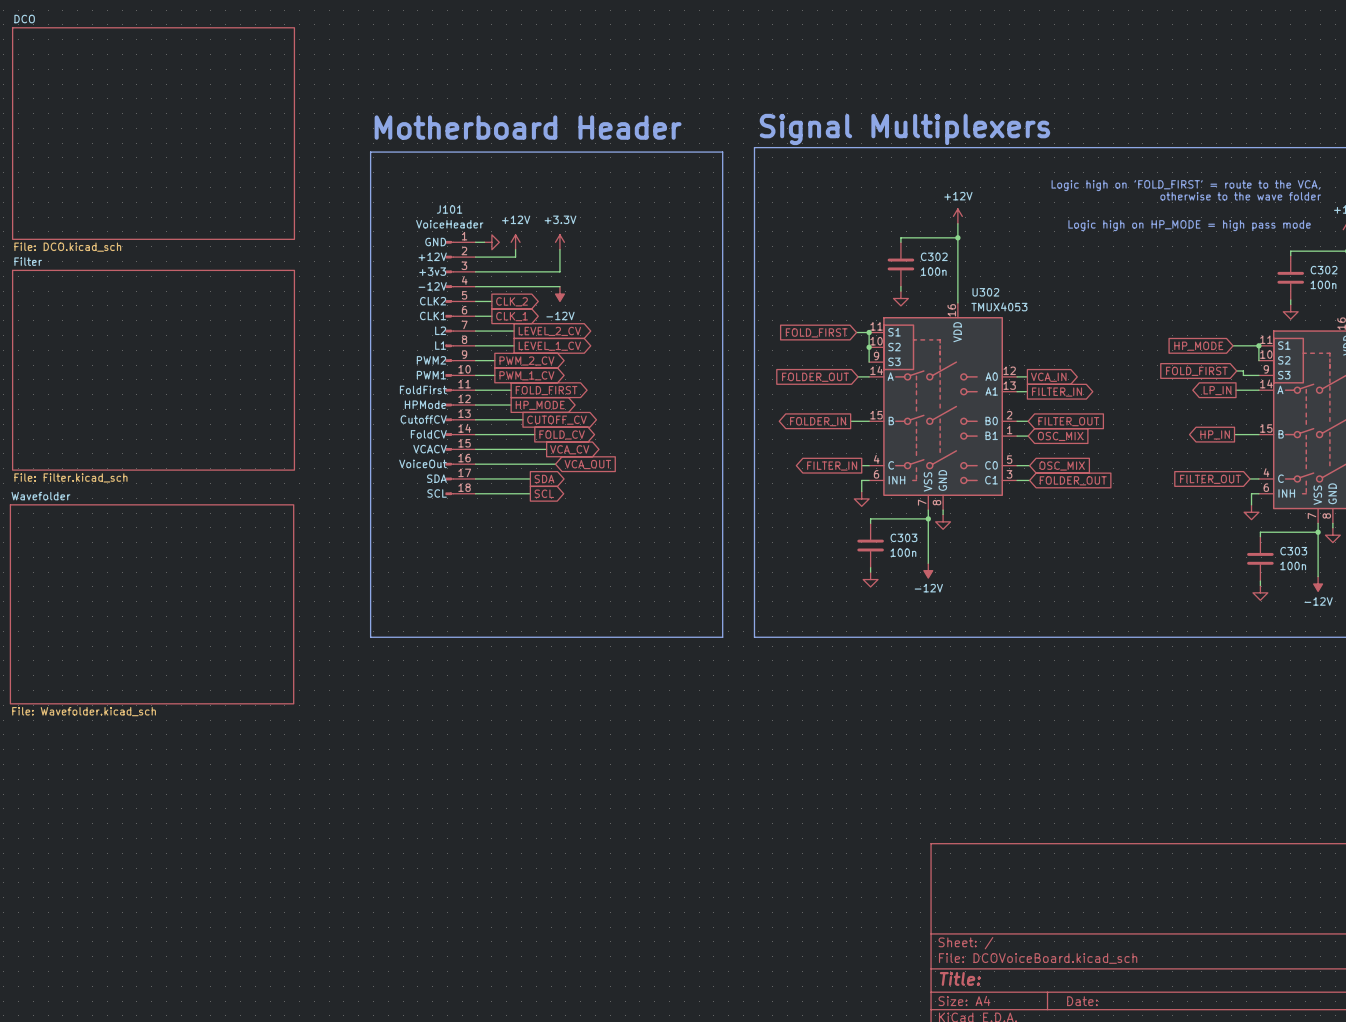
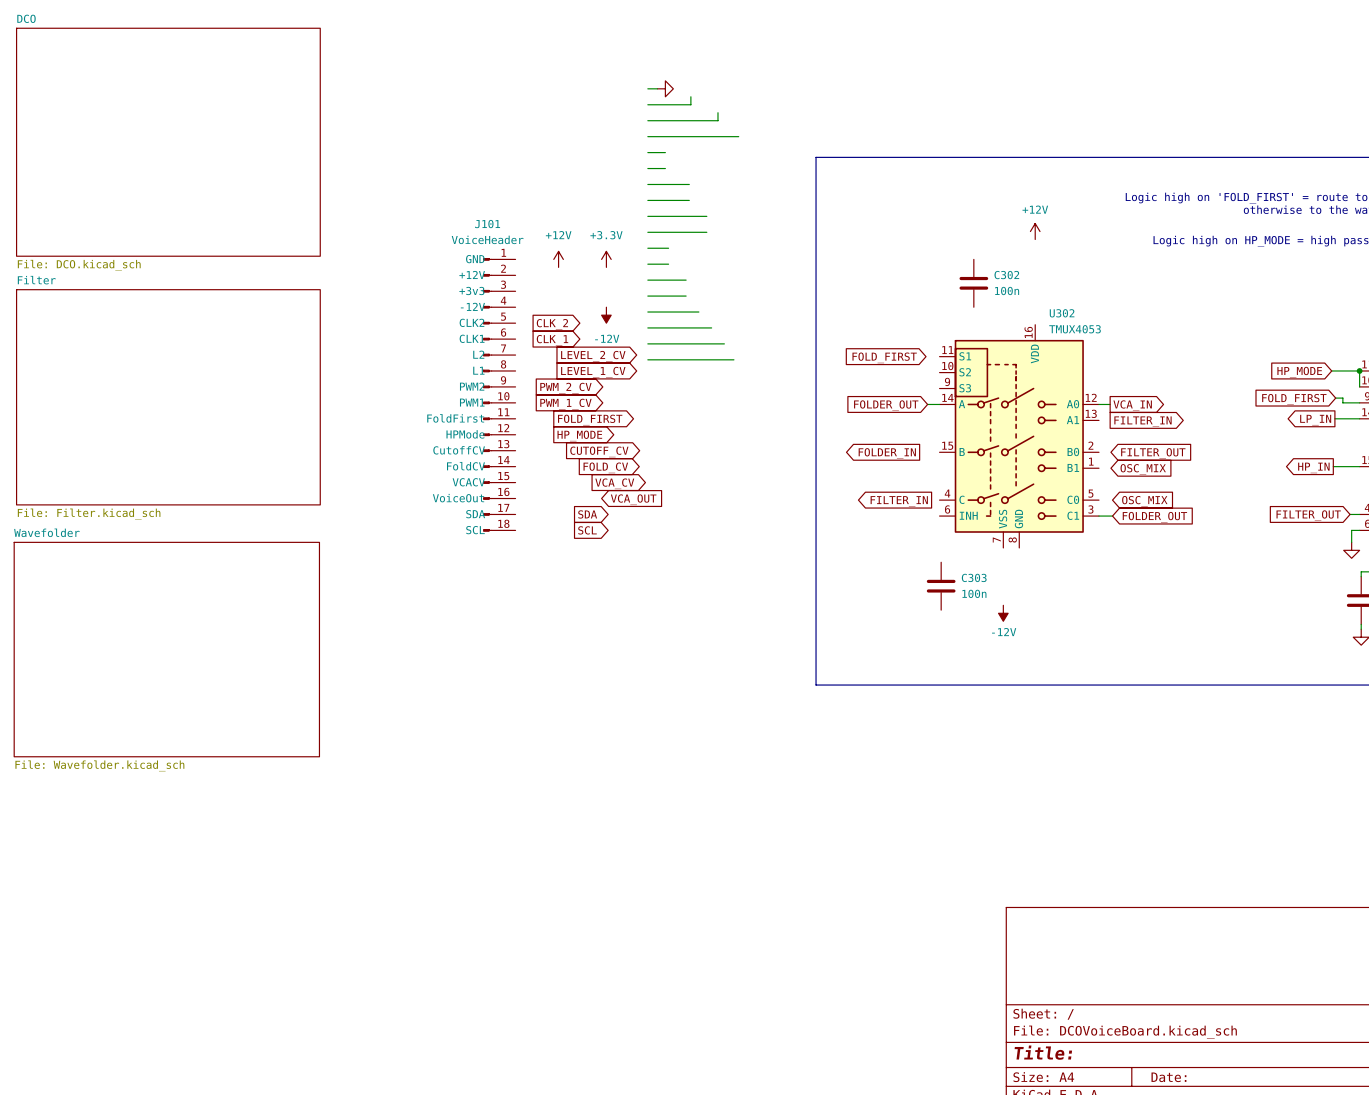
wire: none -> (647, 88) (657, 88)
power symbol: none -> (665, 88)
wire: none -> (690, 96) (690, 104) (647, 104)
wire: none -> (717, 112) (717, 120) (647, 120)
text: Motherboard Header (528, 127) -> none
wire: none -> (647, 136) (738, 136)
text: Signal Multiplexers (904, 129) -> none
wire: none -> (647, 152) (665, 152)
line: (370, 152) (722, 152) (722, 637) (370, 637) (370, 152) -> none
wire: none -> (647, 168) (665, 168)
wire: none -> (647, 184) (689, 184)
wire: none -> (647, 200) (689, 200)
wire: none -> (647, 216) (706, 216)
wire: none -> (647, 232) (706, 232)
wire: (957, 223) (957, 302) -> none
wire: none -> (647, 248) (668, 248)
wire: (957, 237) (900, 237) (900, 242) -> none
junction: (957, 237) -> none
wire: (475, 242) (484, 242) -> none
power symbol: (491, 242) -> none
wire: none -> (647, 264) (668, 264)
wire: (515, 249) (515, 257) (475, 257) -> none
wire: (559, 249) (559, 271) (475, 271) -> none
wire: none -> (647, 280) (686, 280)
wire: none -> (647, 296) (686, 296)
wire: (475, 286) (559, 286) -> none
wire: (900, 286) (900, 291) -> none
wire: none -> (647, 312) (698, 312)
power symbol: (900, 298) -> none
wire: (475, 301) (491, 301) -> none
wire: none -> (647, 327) (711, 327)
wire: (475, 316) (491, 316) -> none
wire: none -> (647, 343) (724, 343)
wire: (475, 331) (514, 331) -> none
wire: (856, 332) (869, 332) (869, 362) -> none
junction: (869, 332) -> none
wire: none -> (647, 359) (733, 359)
wire: (475, 345) (514, 345) -> none
junction: (869, 347) -> none
wire: (475, 360) (494, 360) -> none
wire: (475, 375) (494, 375) -> none
wire: (475, 390) (511, 390) -> none
wire: (1017, 391) (1027, 391) -> none
wire: (475, 405) (511, 405) -> none
wire: (475, 419) (522, 419) -> none
wire: (850, 421) (869, 421) -> none
wire: (1017, 421) (1028, 421) -> none
wire: (475, 434) (534, 434) -> none
wire: (1017, 436) (1028, 436) -> none
wire: (475, 449) (546, 449) -> none
wire: (475, 464) (555, 464) -> none
wire: (861, 465) (869, 465) -> none
wire: (1017, 465) (1029, 465) -> none
wire: (475, 478) (530, 478) -> none
wire: (869, 480) (861, 480) (861, 491) -> none
wire: (475, 493) (530, 493) -> none
power symbol: (861, 498) -> none
wire: (928, 510) (928, 563) -> none
wire: (943, 510) (943, 514) -> none
wire: (928, 518) (870, 518) (870, 523) -> none
junction: (928, 518) -> none
power symbol: (943, 521) -> none
wire: (870, 567) (870, 572) -> none
power symbol: (870, 579) -> none

